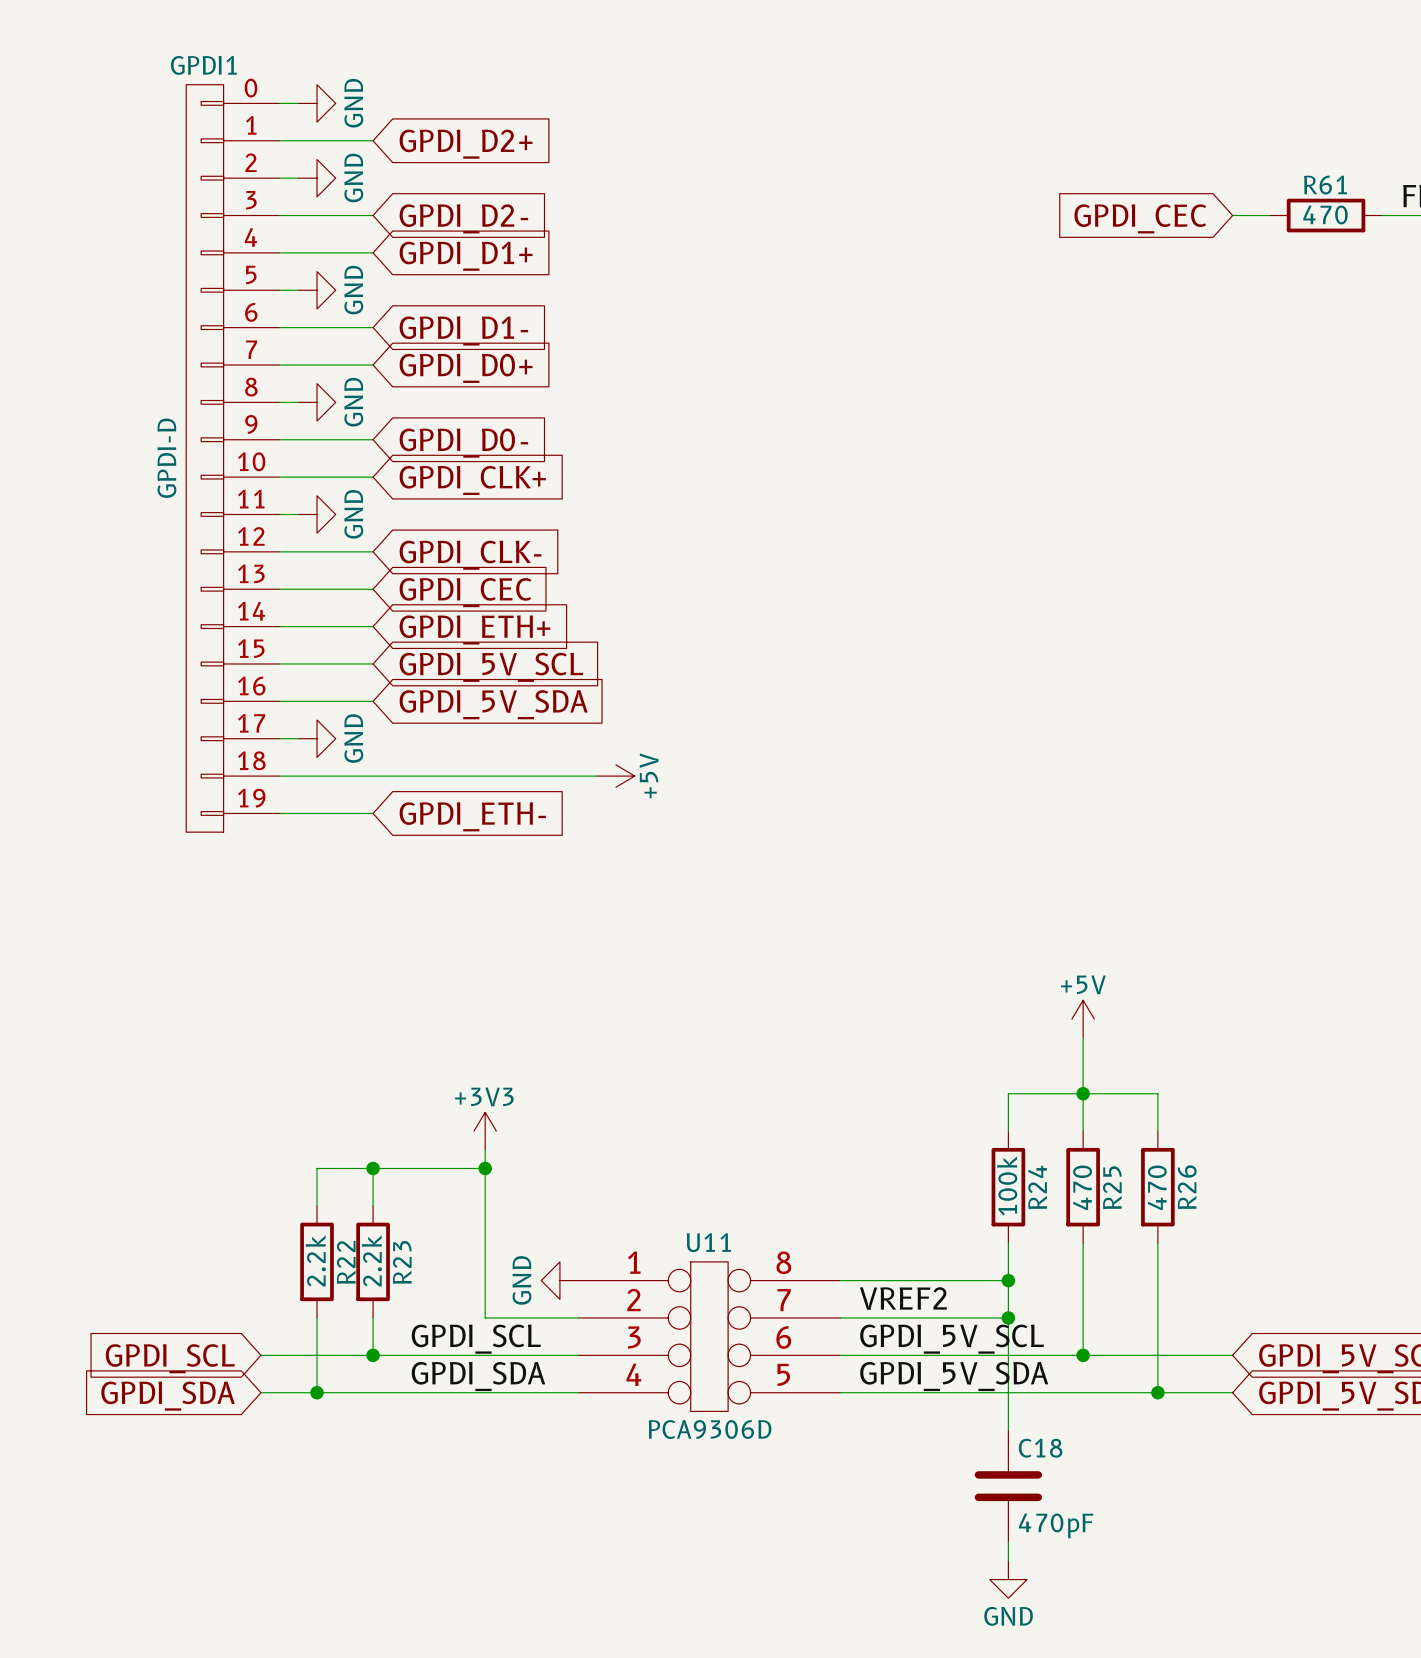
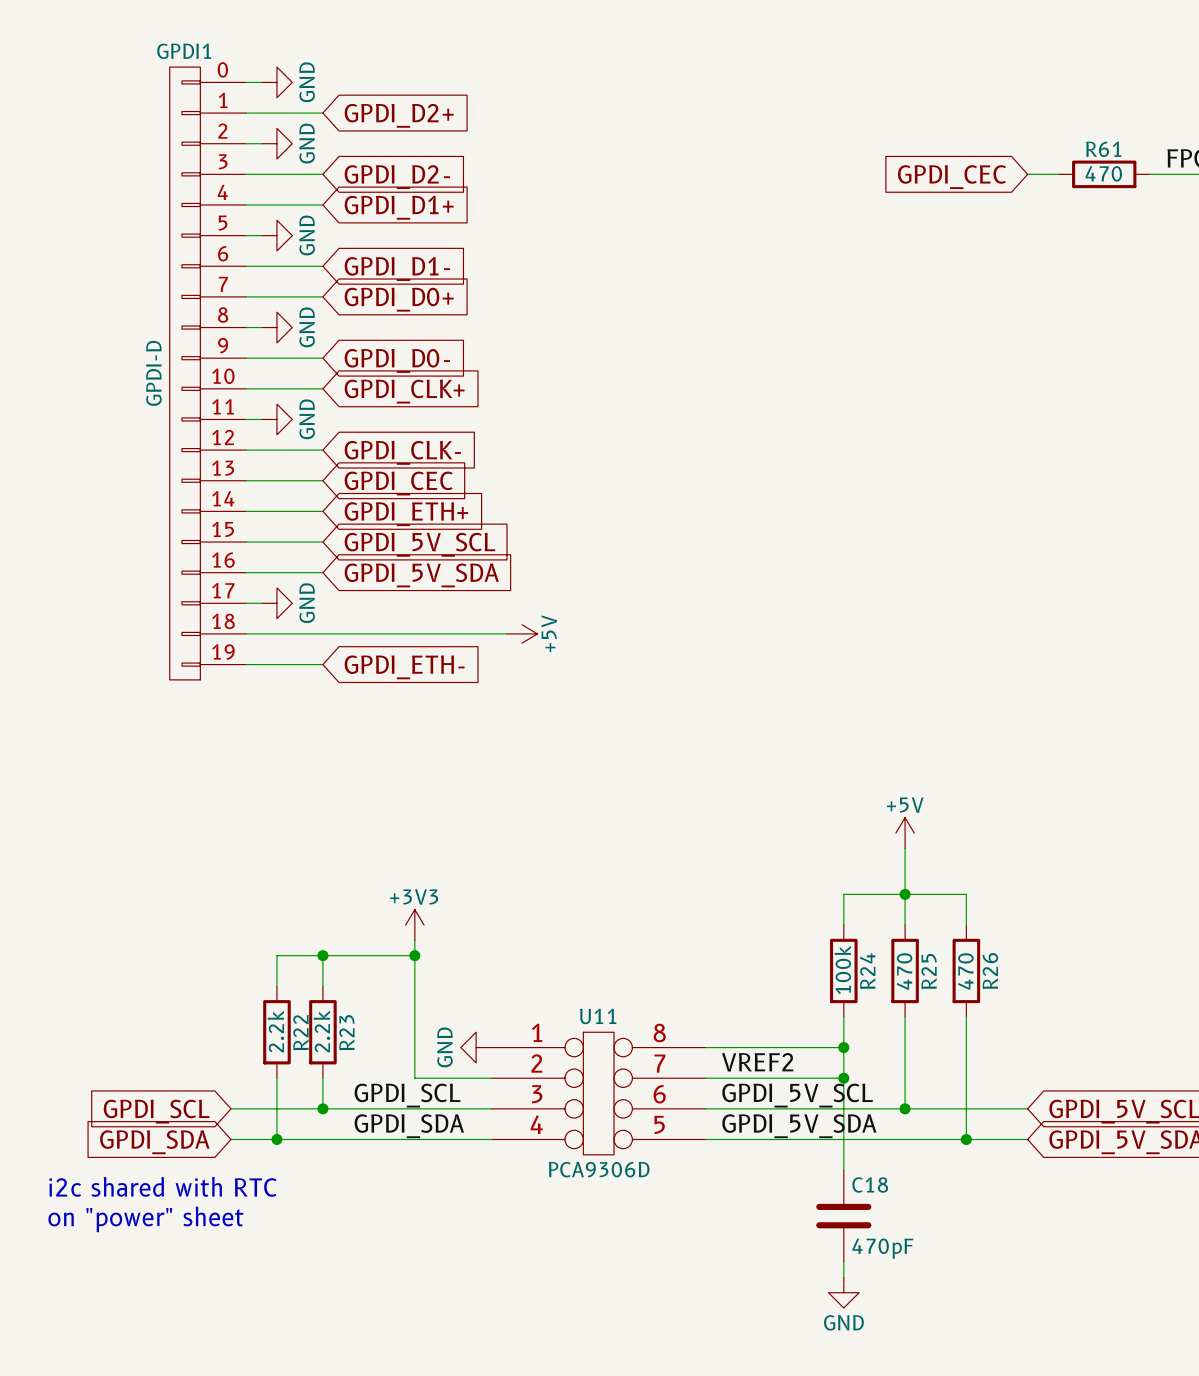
text: none -> i2c shared with RTC (163, 1186)
text: none -> on "power" sheet (145, 1219)

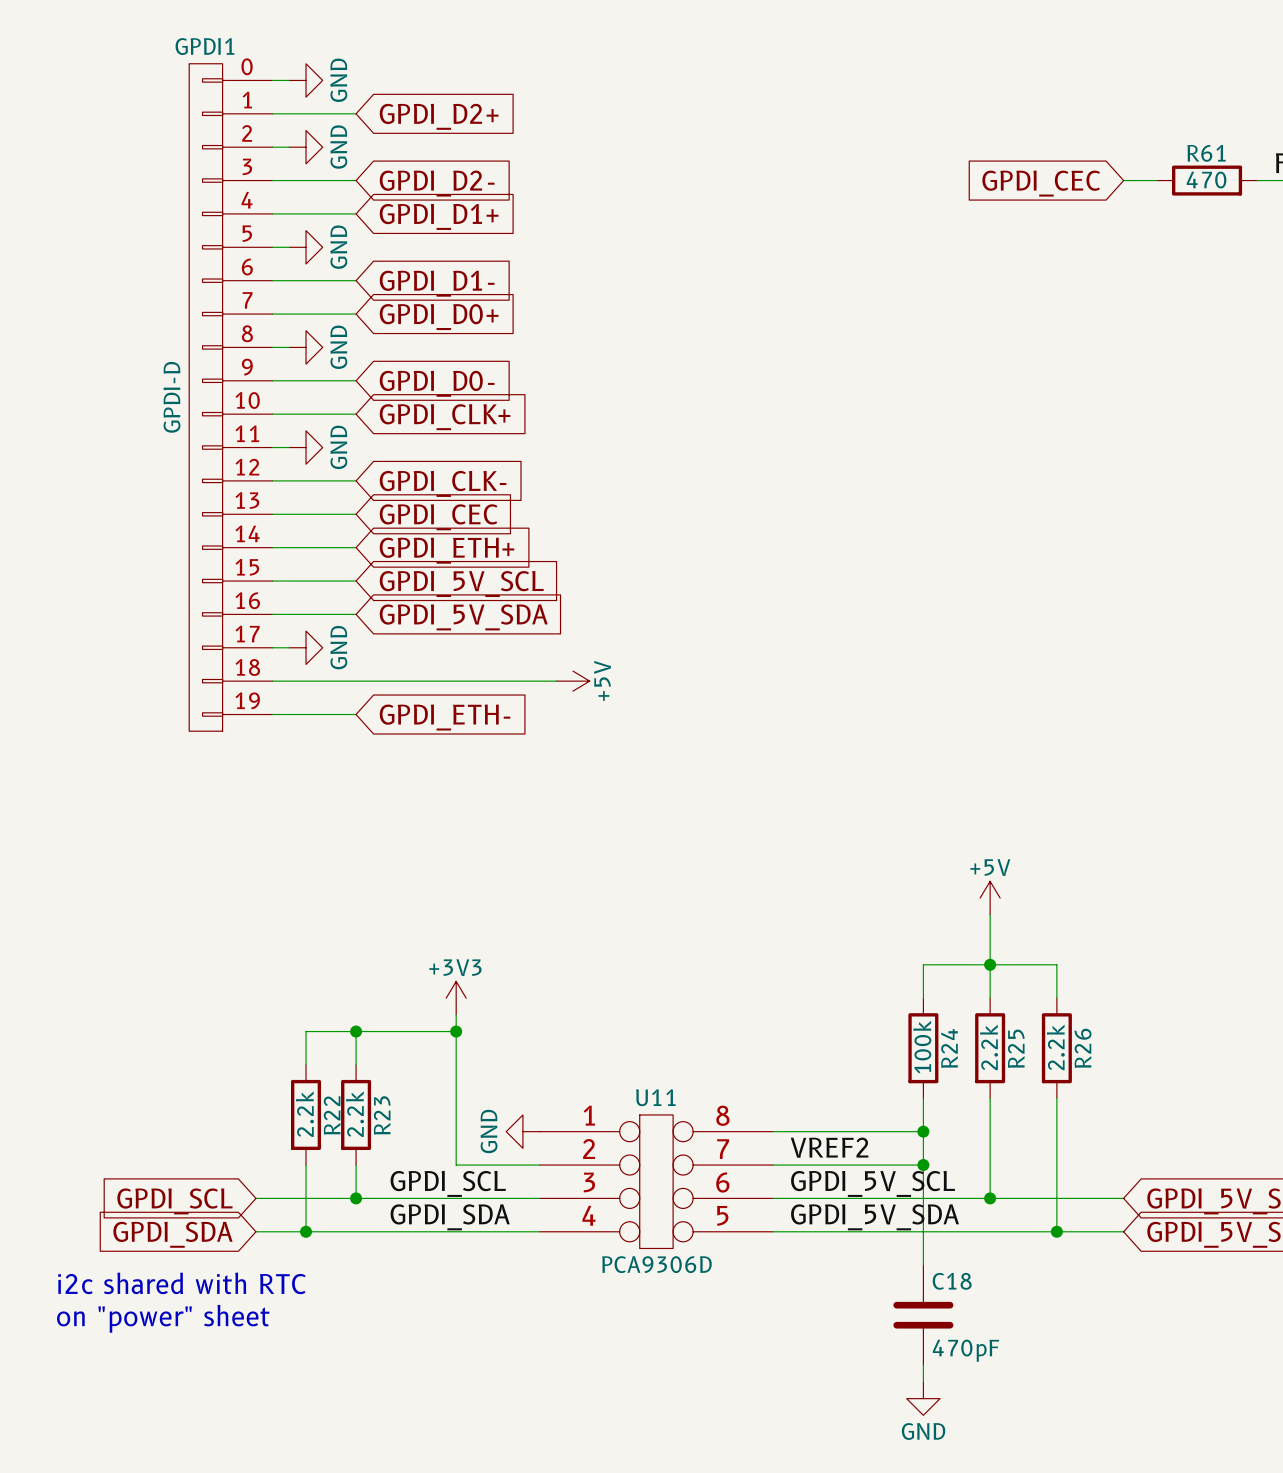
R25 value: 470 (904, 971) -> 2.2k (989, 1047)
R26 value: 470 (965, 971) -> 2.2k (1055, 1047)

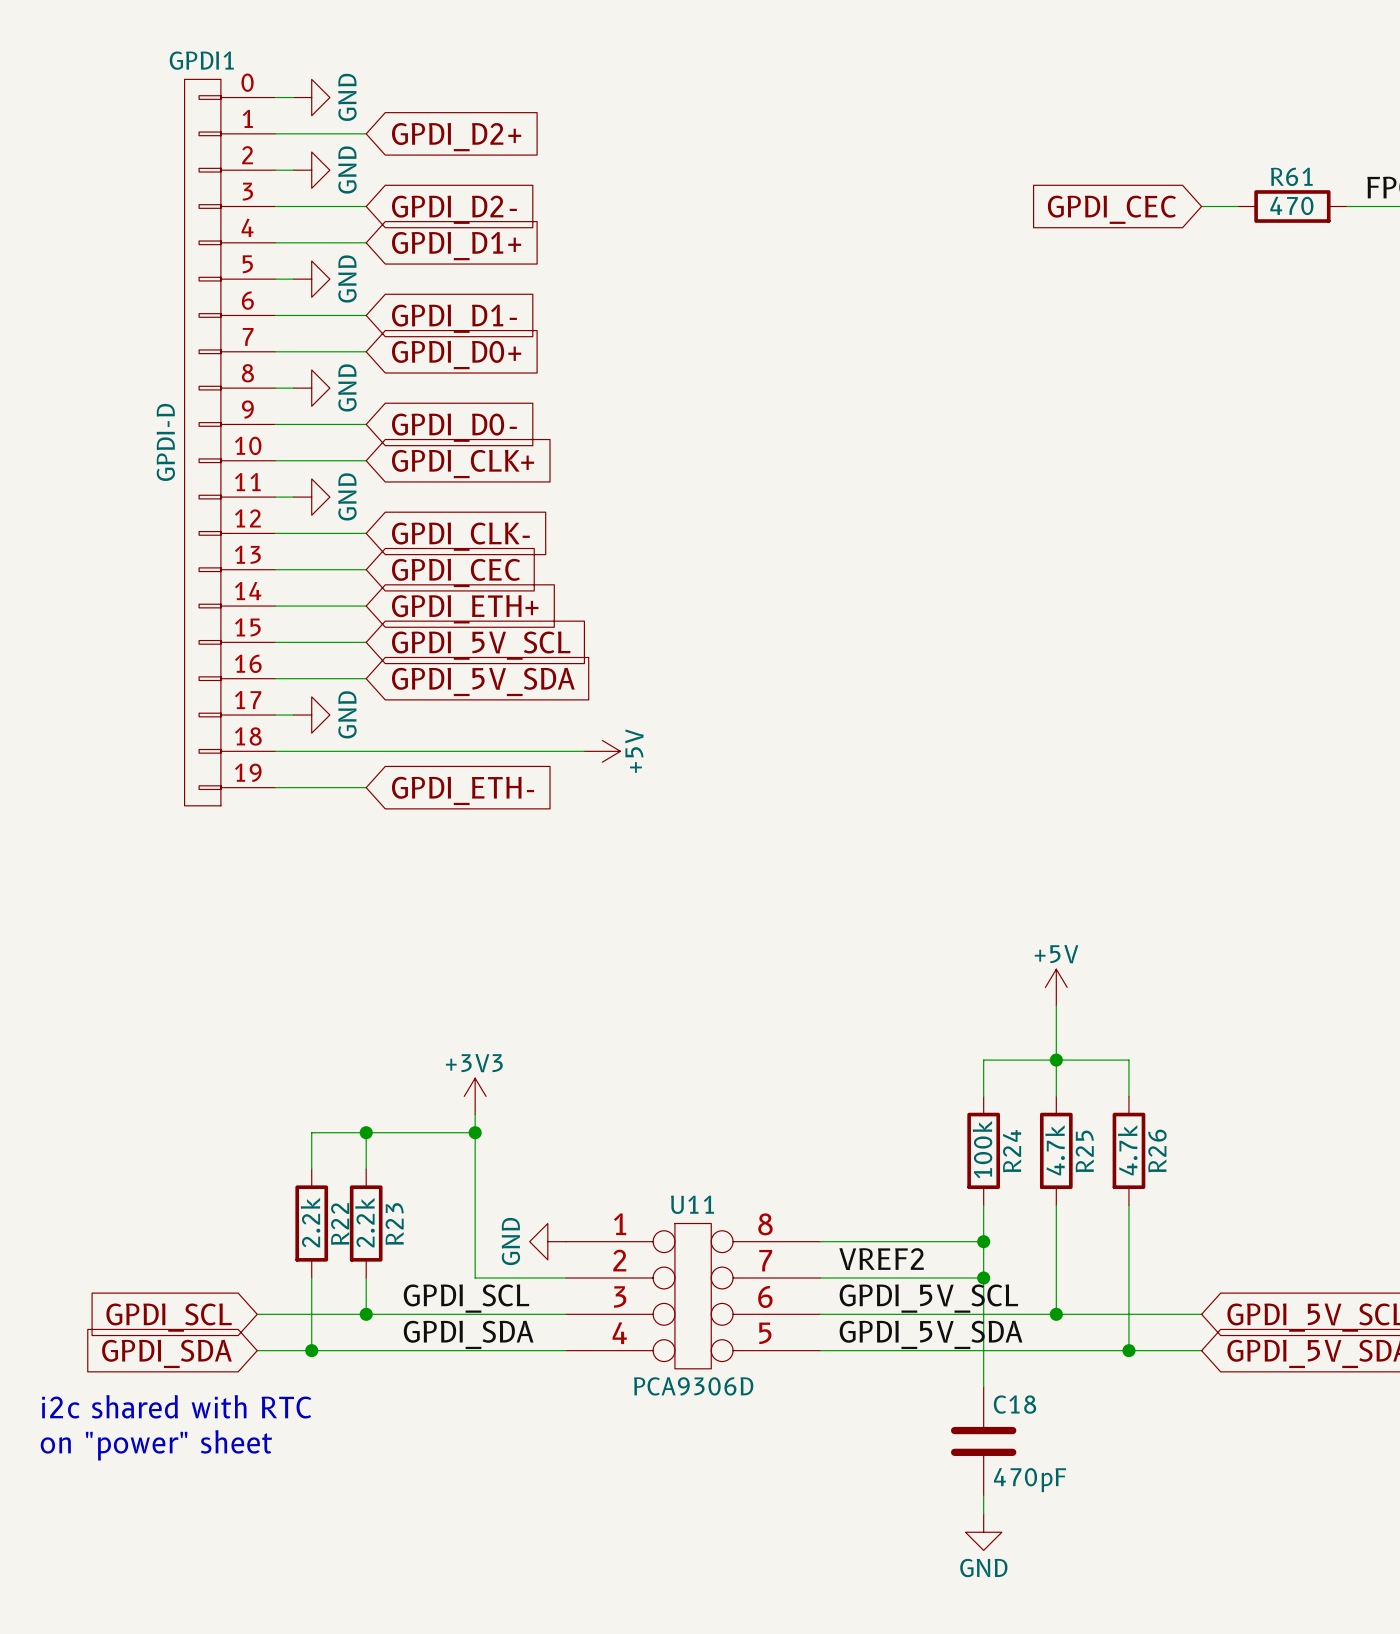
R25 value: 2.2k (989, 1047) -> 4.7k (1055, 1150)
R26 value: 2.2k (1055, 1047) -> 4.7k (1127, 1150)

